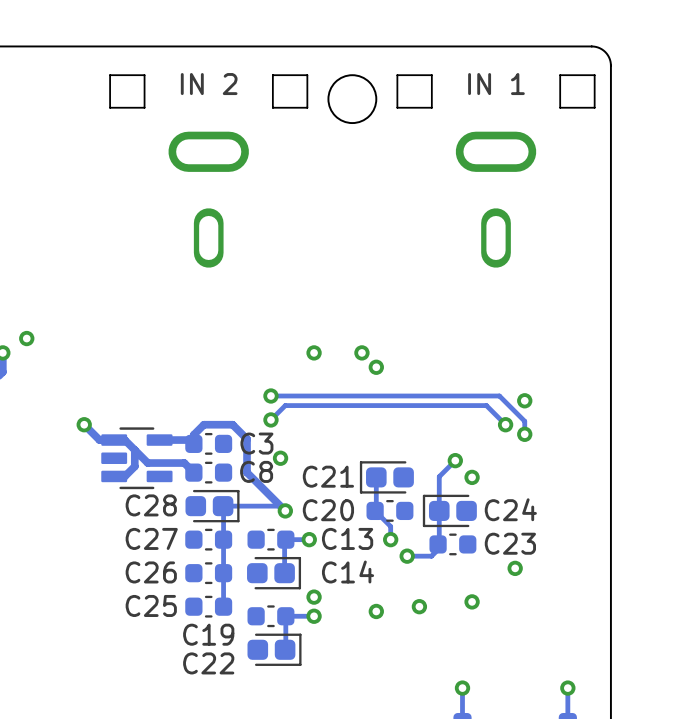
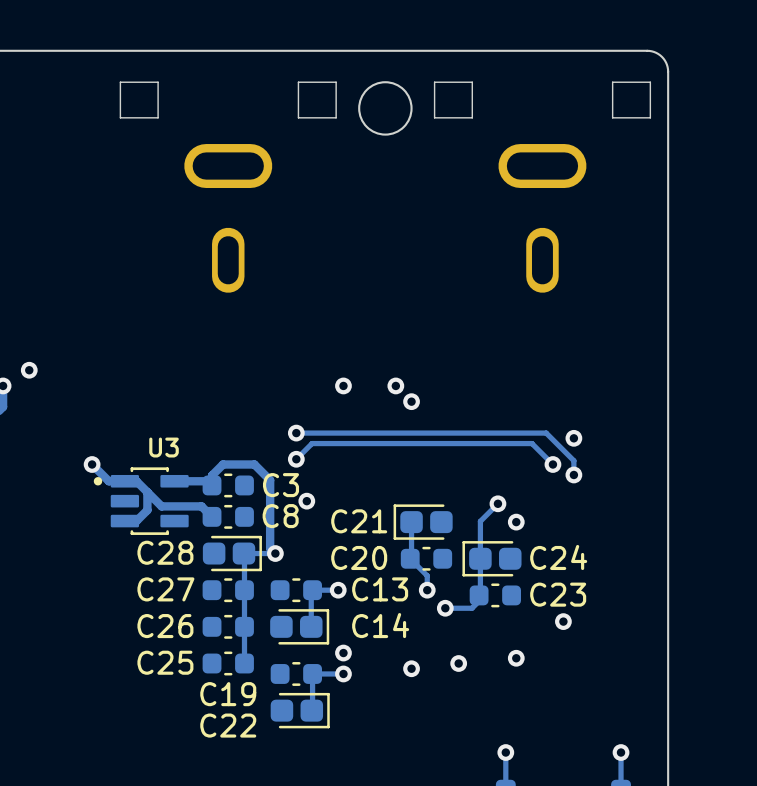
text: IN 2 (209, 84) -> none
text: IN 1 (496, 84) -> none
U3: none -> (141, 501)
part: (136, 458) -> none
track: (247, 472) (285, 510) (280, 506) (251, 506) -> (270, 516) (270, 548) (275, 553)
via position: (285, 510) -> (275, 553)

